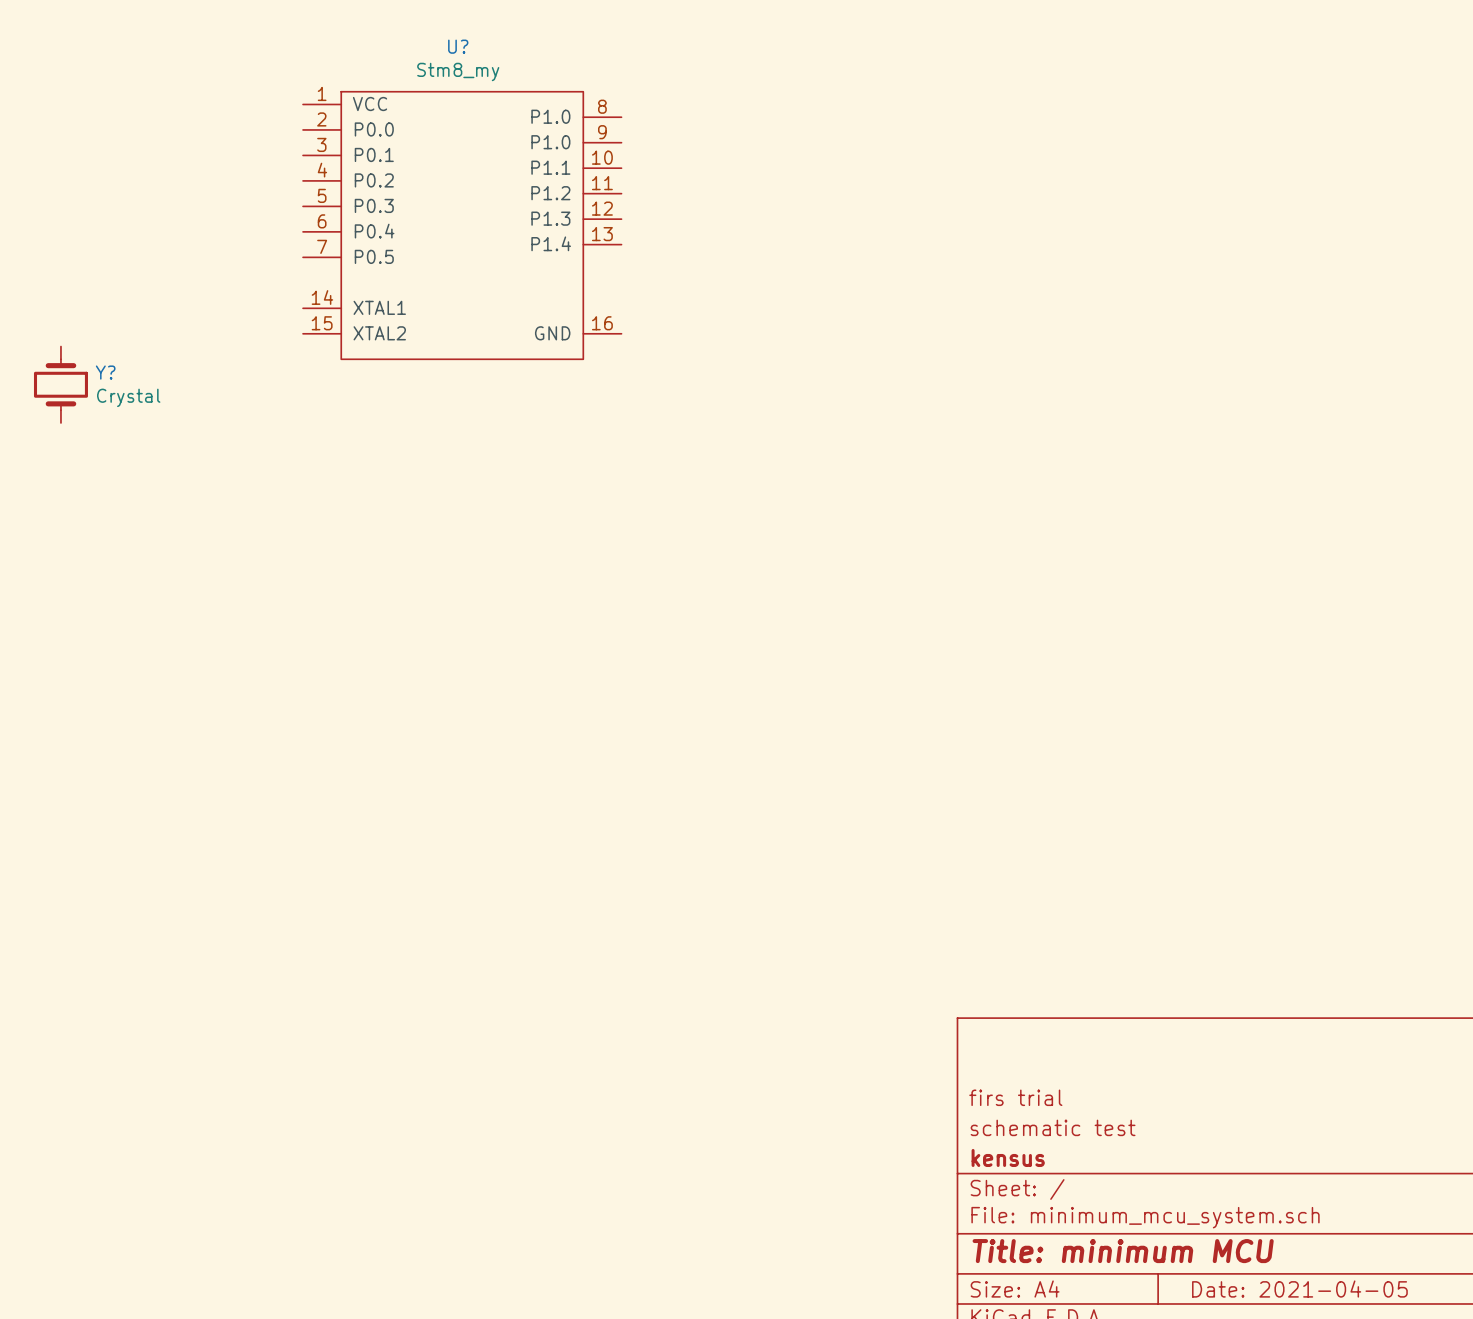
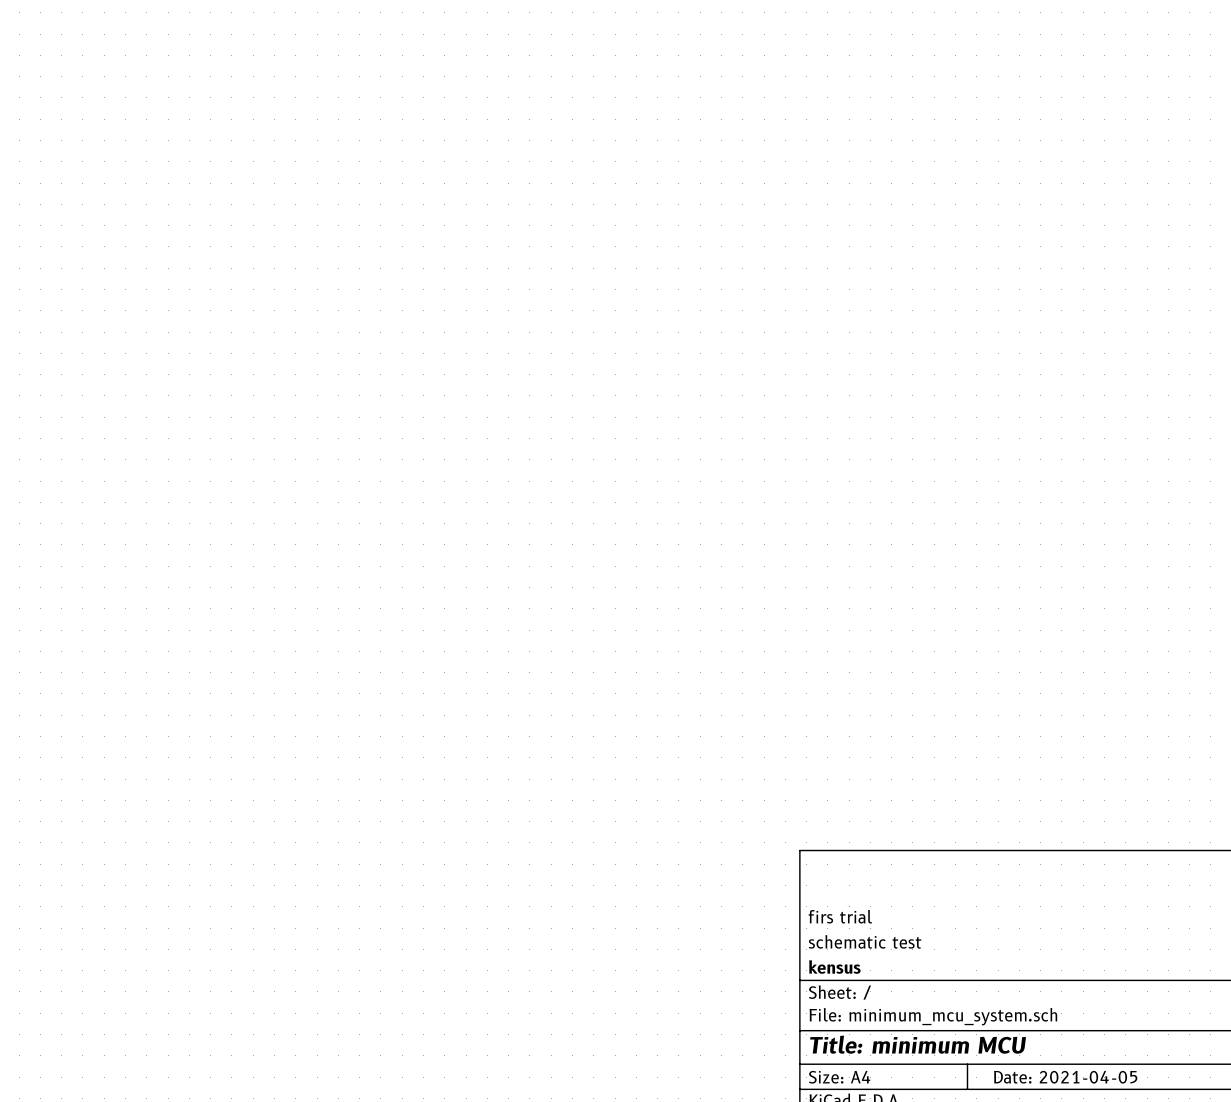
U?: Stm8_my (455, 225) -> none
Y?: Crystal (60, 384) -> none

